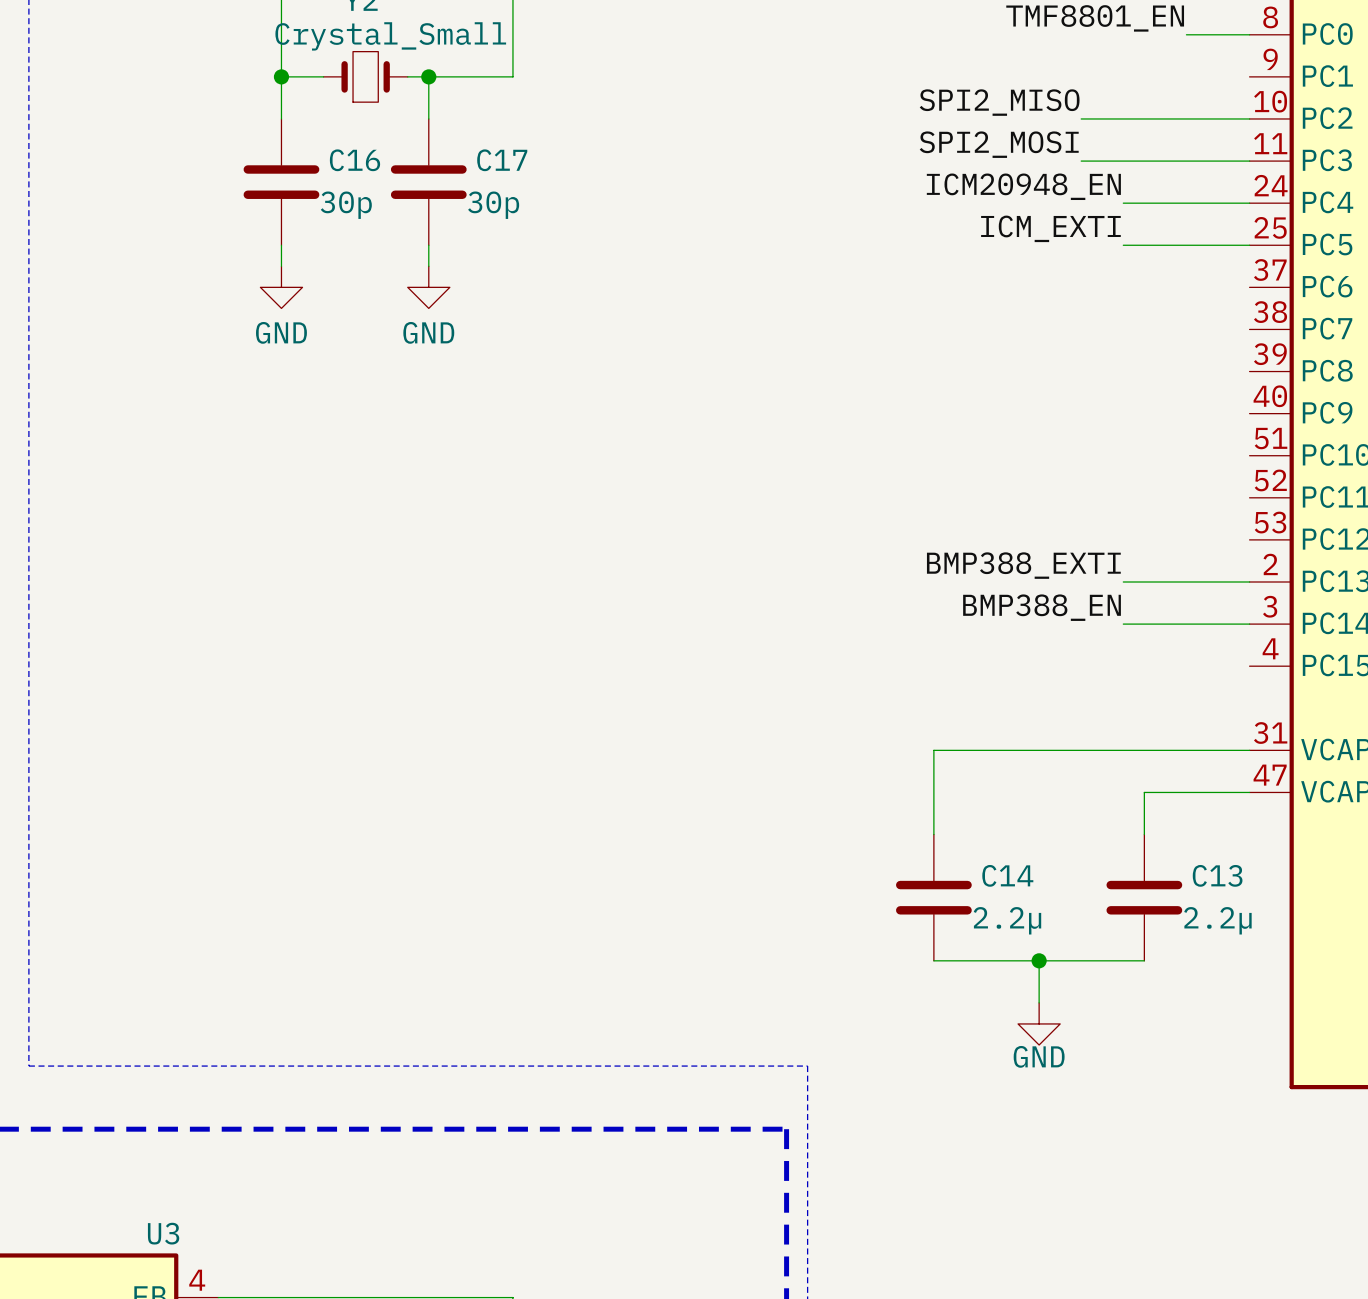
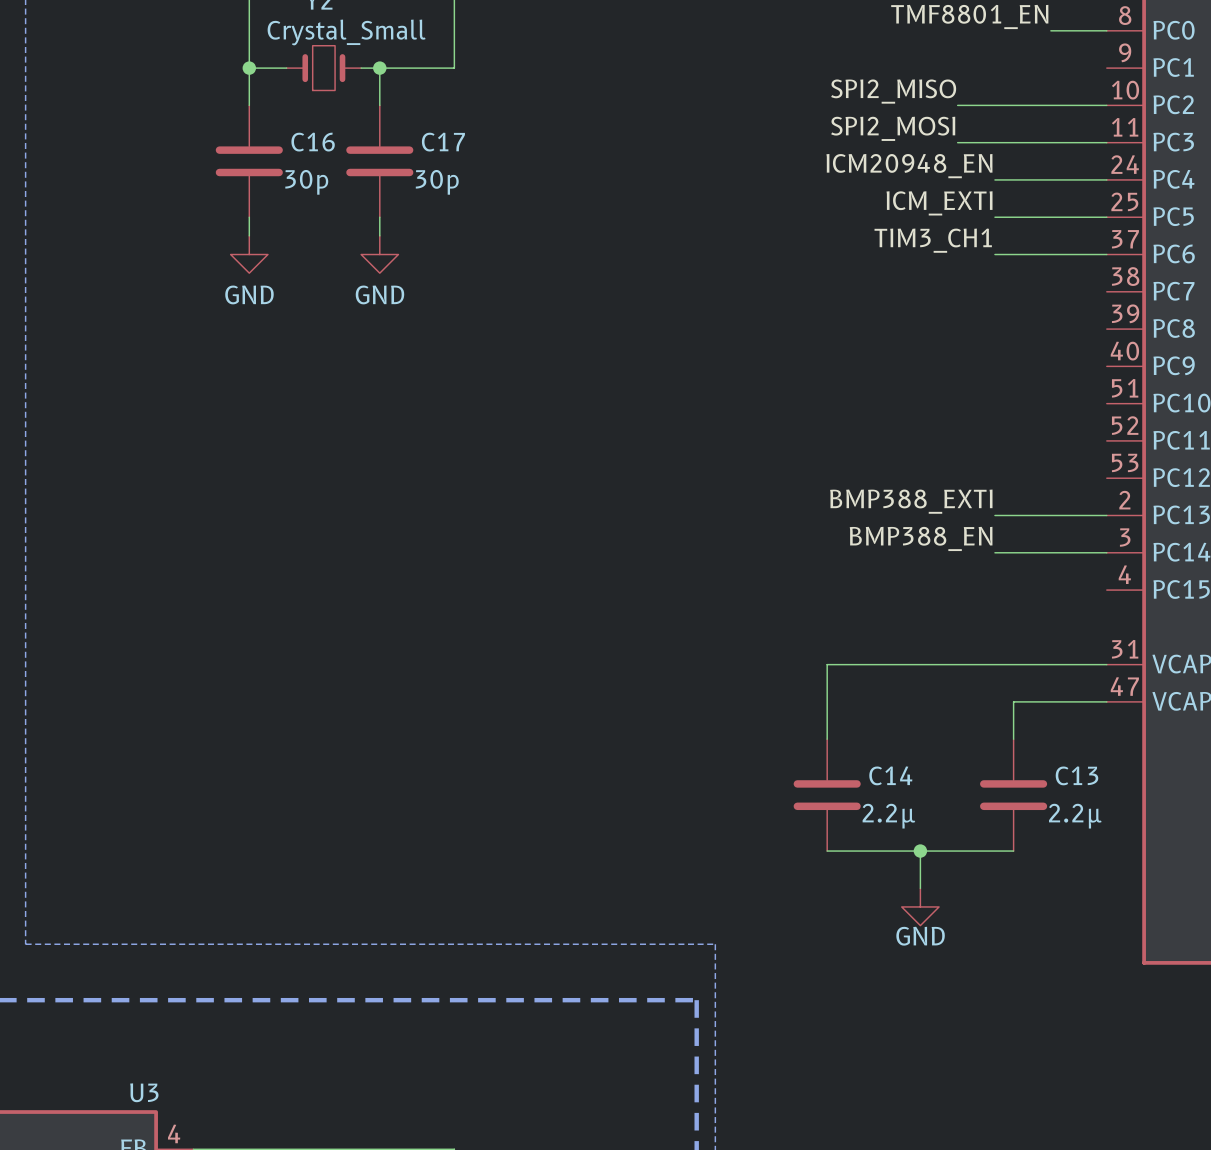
label: none -> TIM3_CH1 (933, 240)
wire: none -> (994, 254) (1106, 254)

